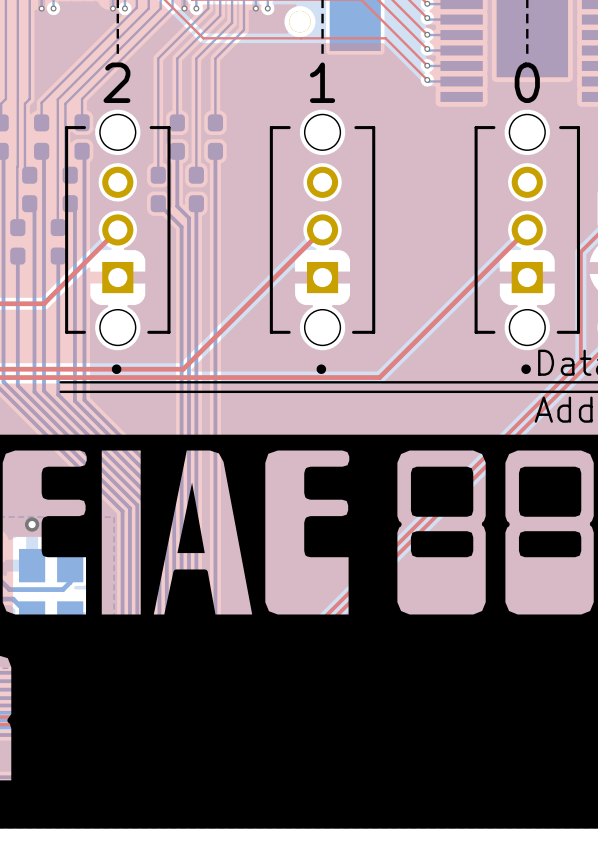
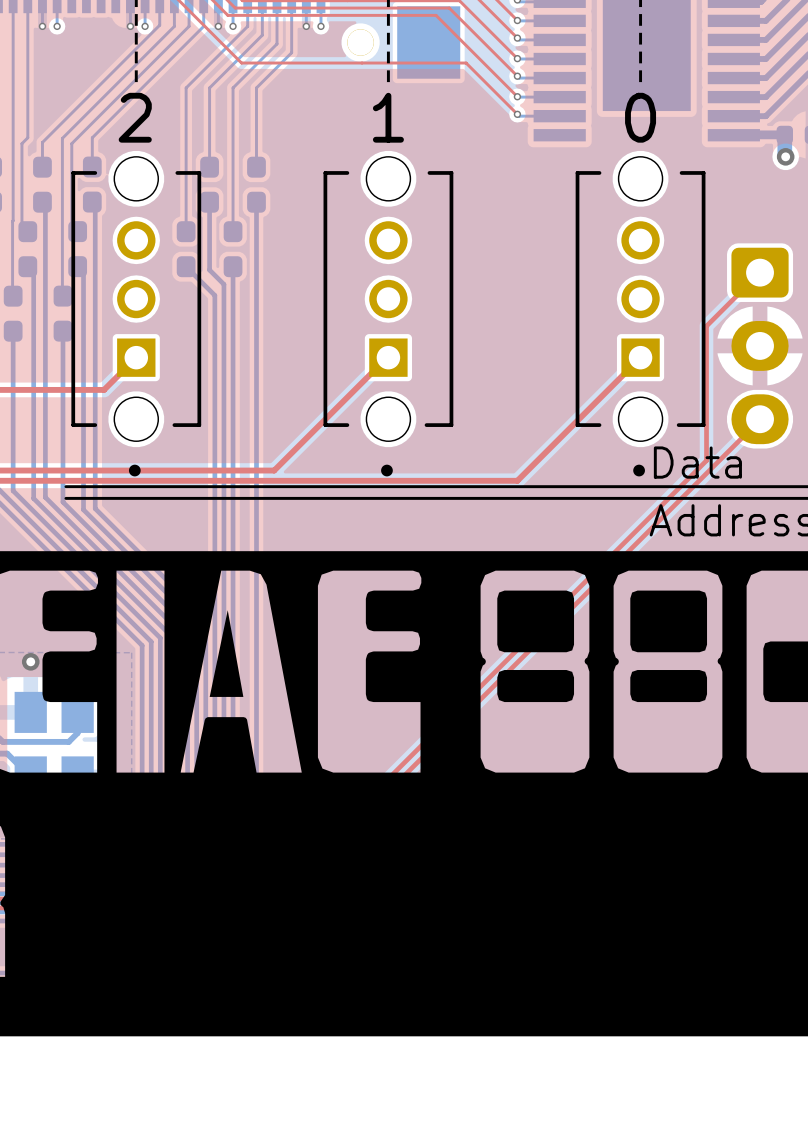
top track: (118, 230) (44, 303) -> (137, 359) (134, 359) (104, 389) (45, 389)
top track: (323, 230) (183, 369) -> (389, 359) (385, 359) (274, 470) (216, 470)
top track: (528, 230) (379, 377) -> (641, 359) (638, 359) (517, 480) (458, 480)

